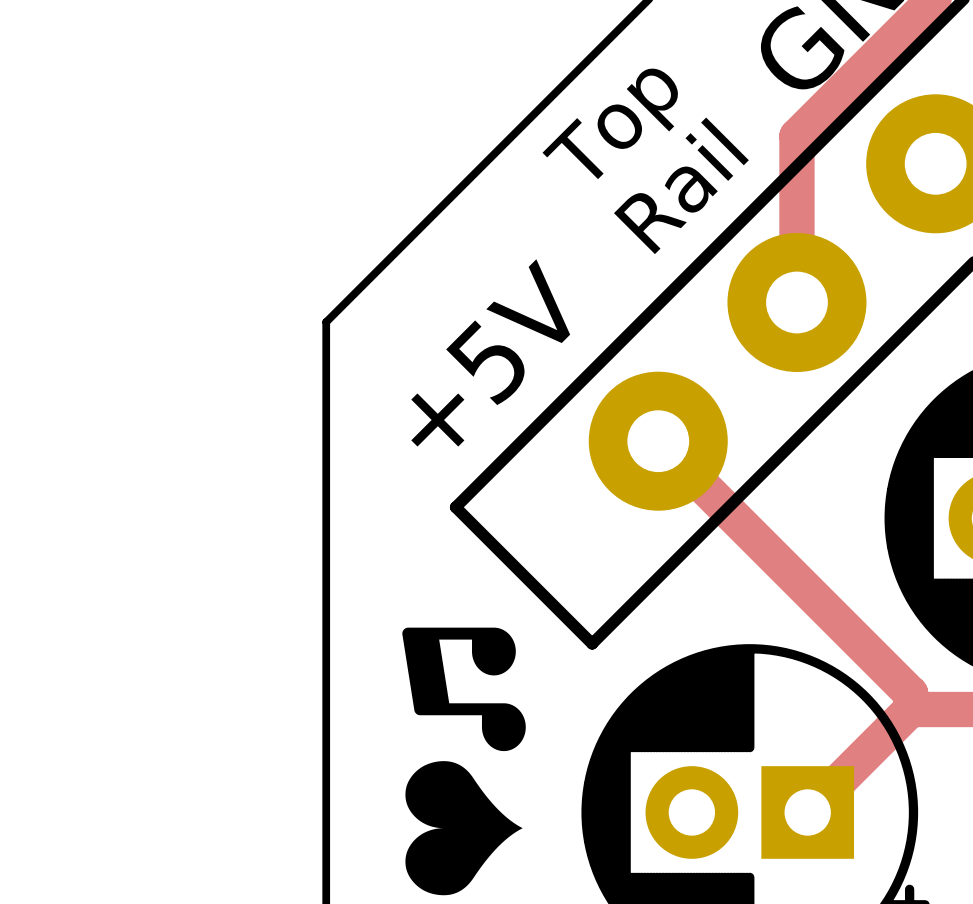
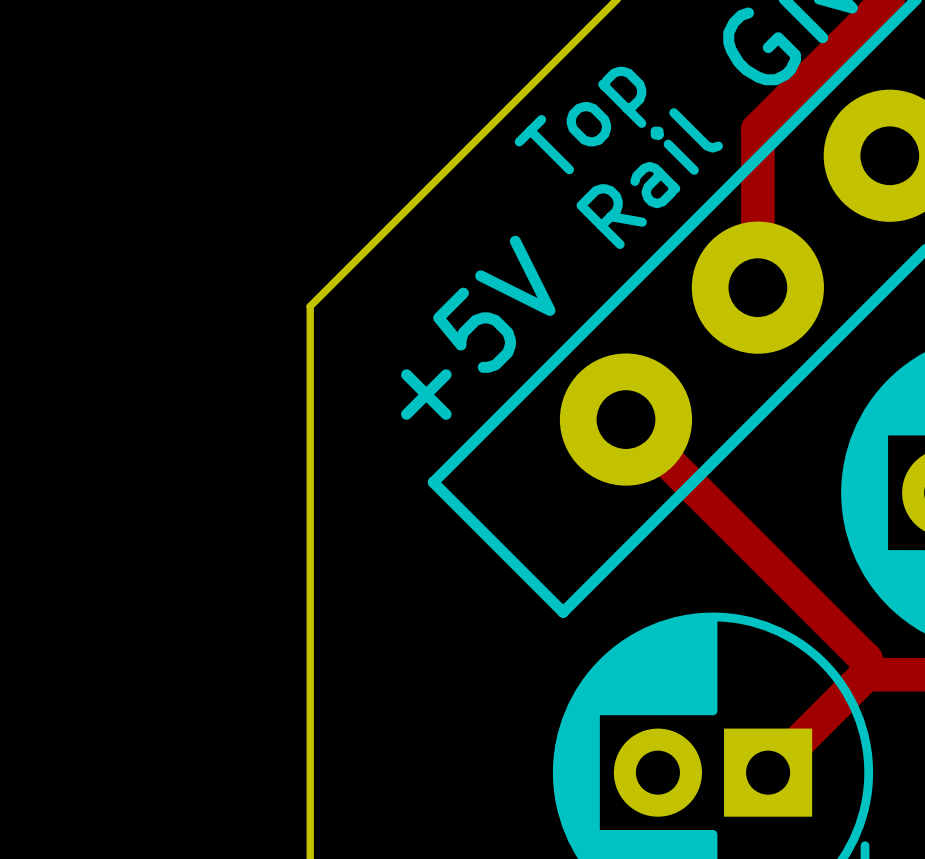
drawing: [402, 627, 526, 896] -> none

